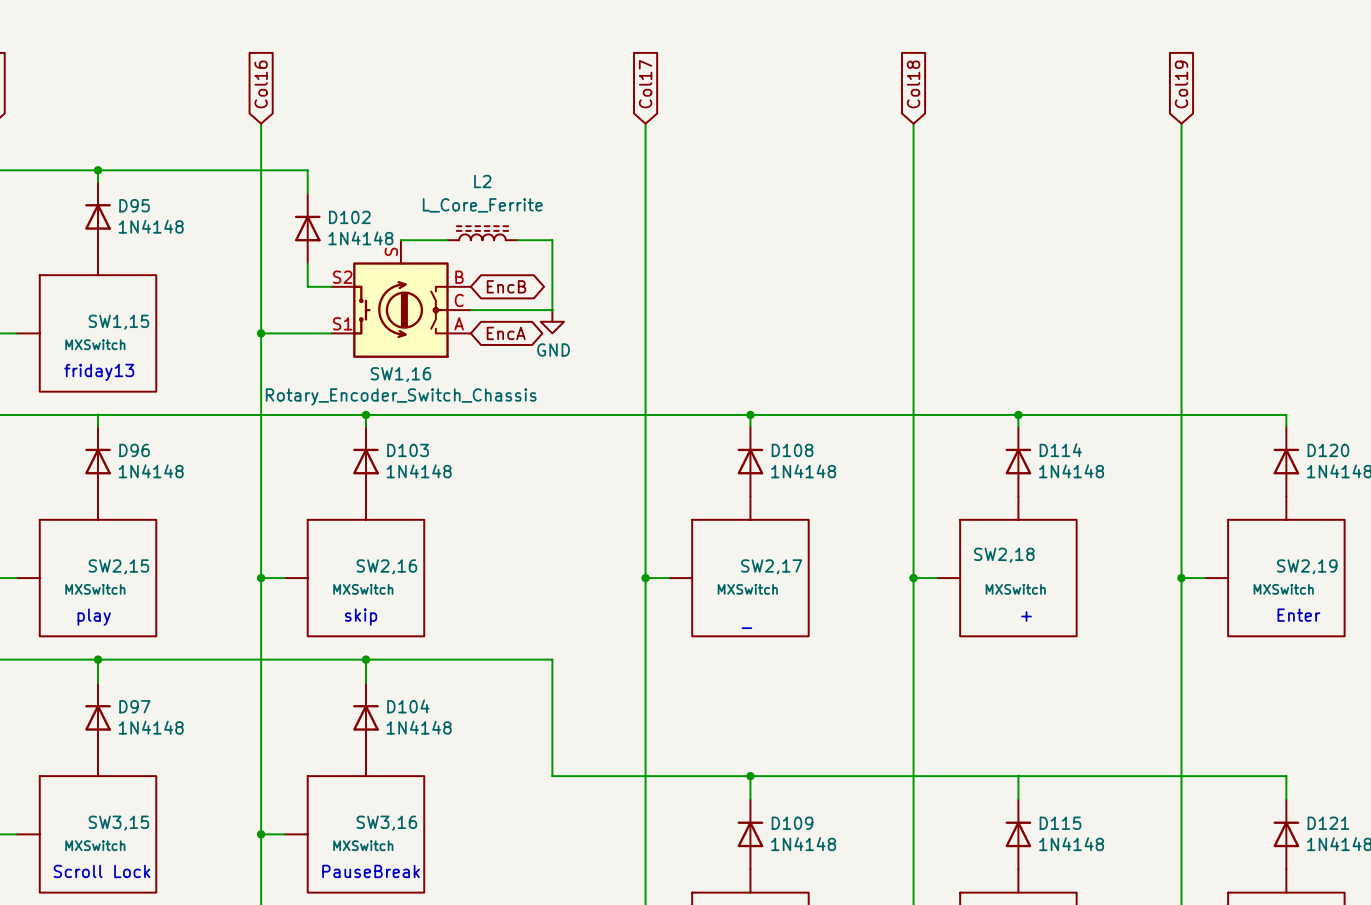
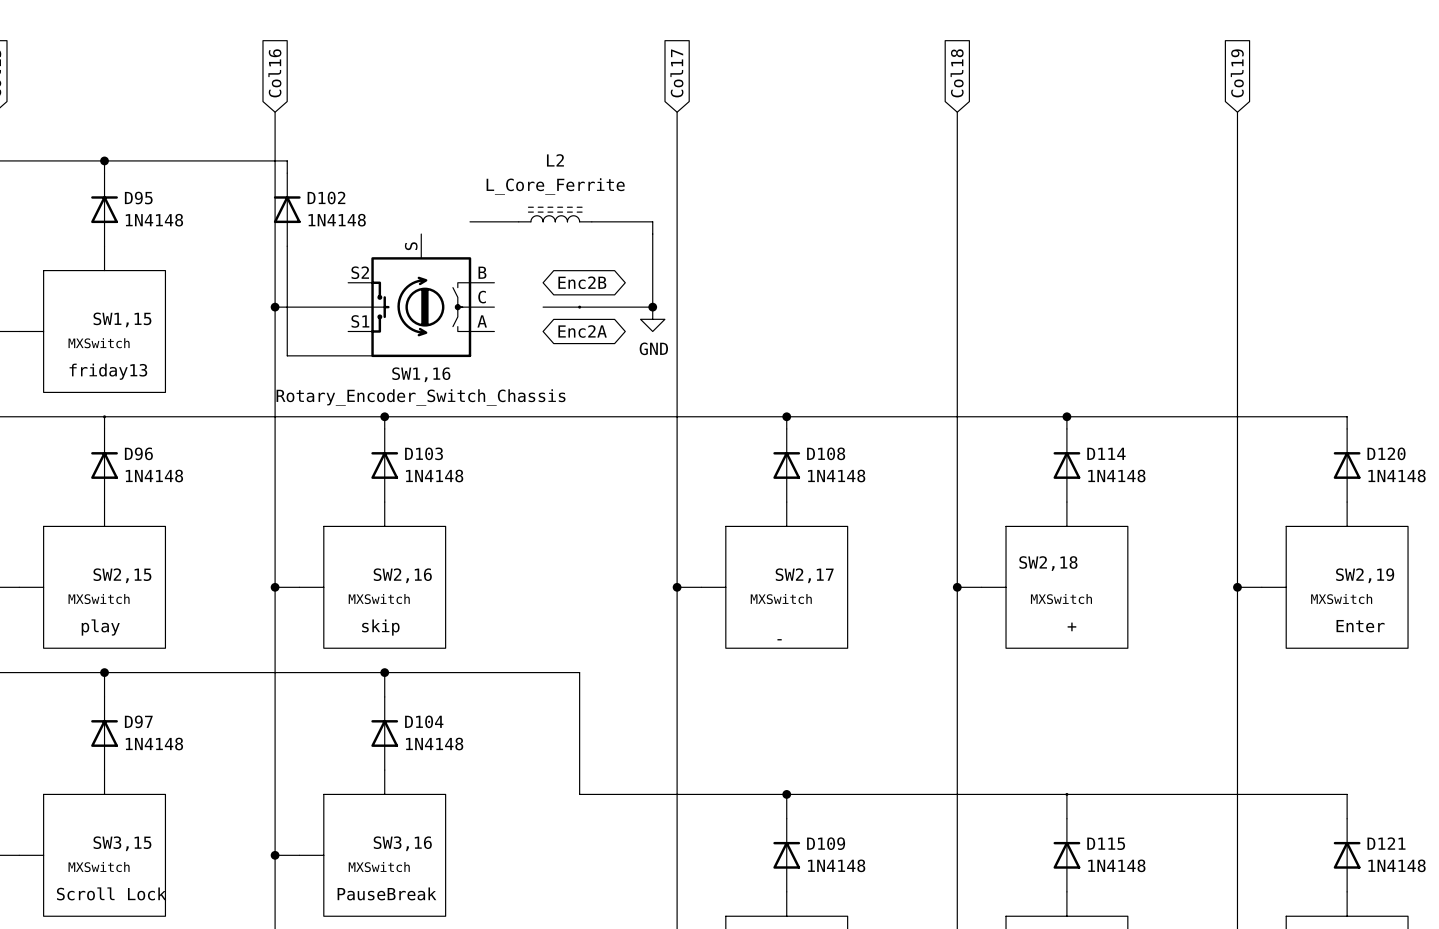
wire: (272, 170) (307, 170) (307, 193) -> (287, 160) (287, 173)
D102 position: (307, 228) -> (287, 209)
L2 position: (482, 233) -> (555, 214)
wire: (400, 240) (447, 240) -> (469, 221) (518, 221)
wire: (517, 240) (552, 240) (552, 310) -> (591, 221) (652, 221) (652, 307) (579, 307)
wire: none -> (287, 246) (287, 355) (384, 355)
wire: (307, 263) (307, 286) (331, 286) -> none
global label: EncB (506, 286) -> Enc2B (582, 282)
wire: none -> (275, 307) (384, 307)
wire: (470, 310) (517, 310) -> none
junction: none -> (652, 307)
power symbol position: GND (552, 321) -> GND (652, 319)
wire: (261, 333) (331, 333) -> none
junction position: (261, 333) -> (275, 307)
global label: EncA (506, 333) -> Enc2A (582, 331)

